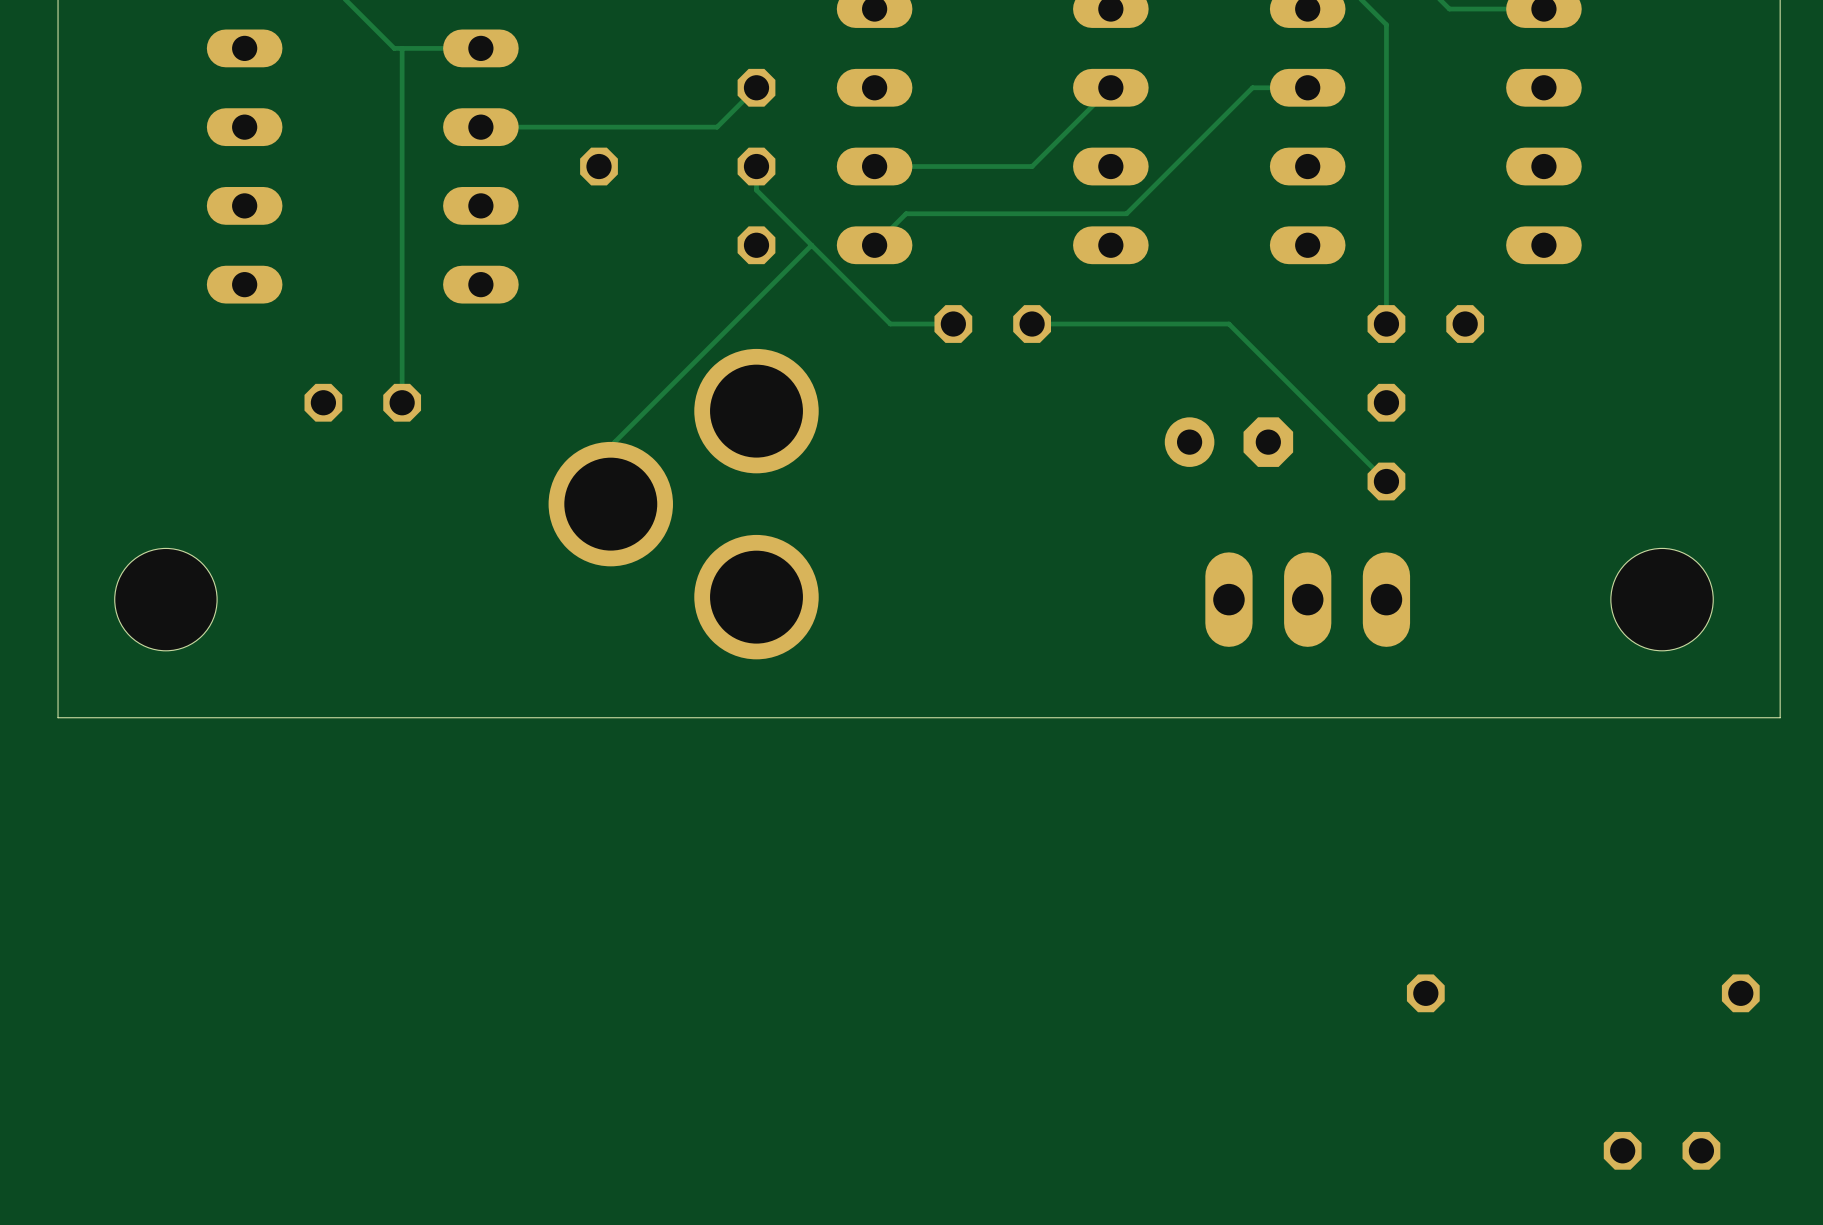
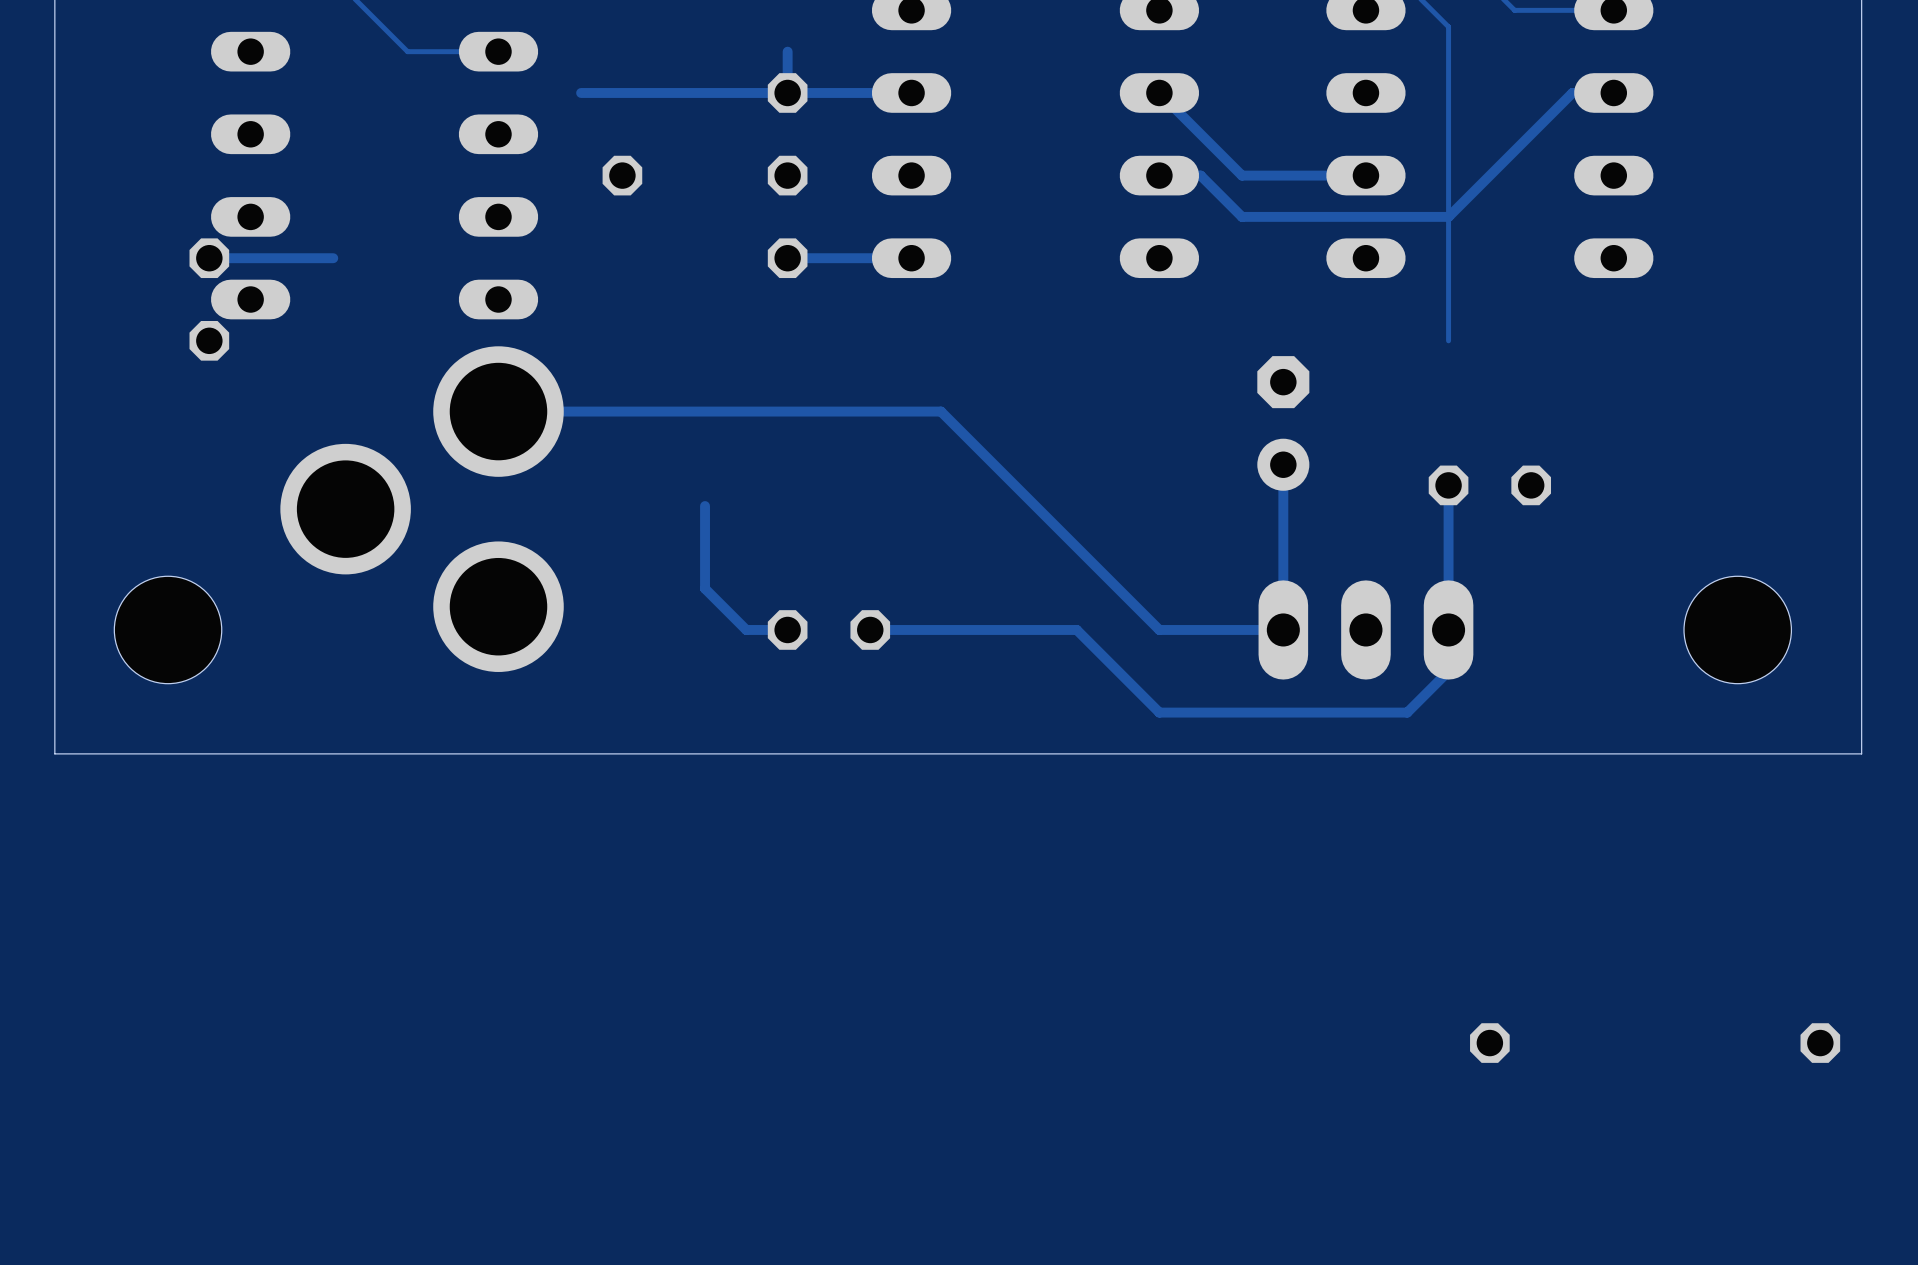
track: (402, 48) (402, 402) -> none
track: (756, 87) (717, 127) (480, 127) -> (787, 92) (787, 51)
track: none -> (911, 92) (581, 92)
track: (1110, 87) (1032, 166) (874, 166) -> (1159, 92) (1242, 175) (1365, 175)
track: (1307, 87) (1252, 87) (1126, 213) (906, 213) (874, 245) -> (787, 258) (911, 258)
track: none -> (1613, 92) (1572, 92) (1448, 216) (1242, 216) (1200, 175) (1159, 175)
track: (756, 166) (756, 190) (890, 324) (953, 324) -> none
track: none -> (333, 258) (209, 258)
track: (811, 245) (614, 442) (614, 497) (610, 504) -> none
part: (992, 324) -> none
track: (1032, 324) (1228, 324) (1386, 481) -> none
part: (1425, 324) -> none
track: none -> (498, 411) (941, 411) (1159, 629) (1283, 629) (1283, 464)
part rotation: 0° (362, 402) -> 90° clockwise (209, 299)
part position: (362, 402) -> (209, 299)
part rotation: 0° (1228, 442) -> 90° counterclockwise (1283, 423)
part rotation: 0° (1386, 442) -> 90° clockwise (1489, 485)
track: none -> (1448, 485) (1448, 671) (1407, 712) (1159, 712) (1076, 629) (870, 629)
track: none -> (705, 506) (705, 588) (746, 629) (787, 629)
part position: (683, 504) -> (422, 509)
part: none -> (828, 629)
part: (1662, 1150) -> none

